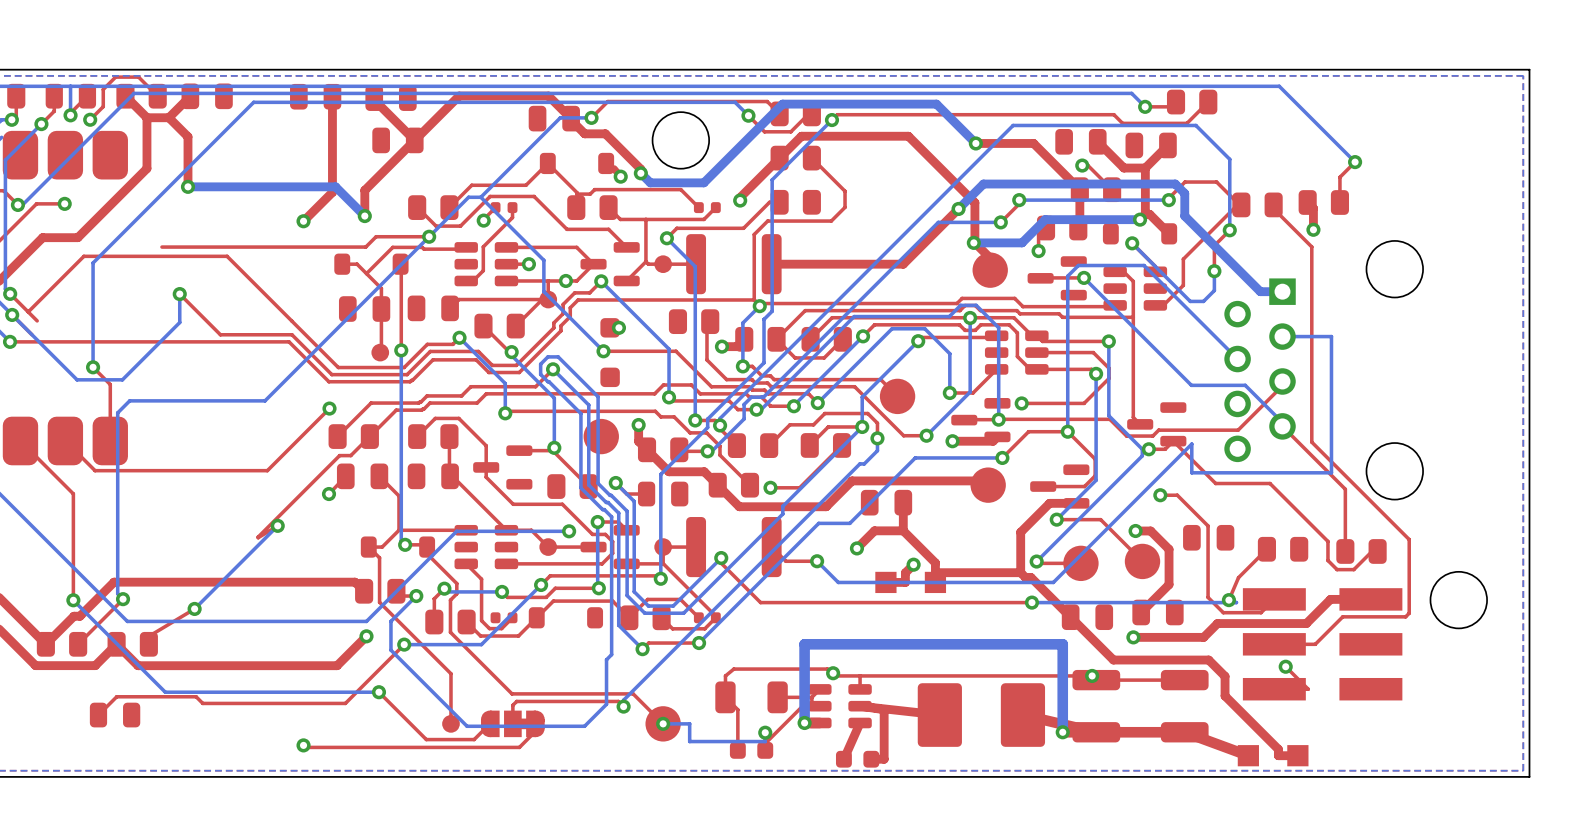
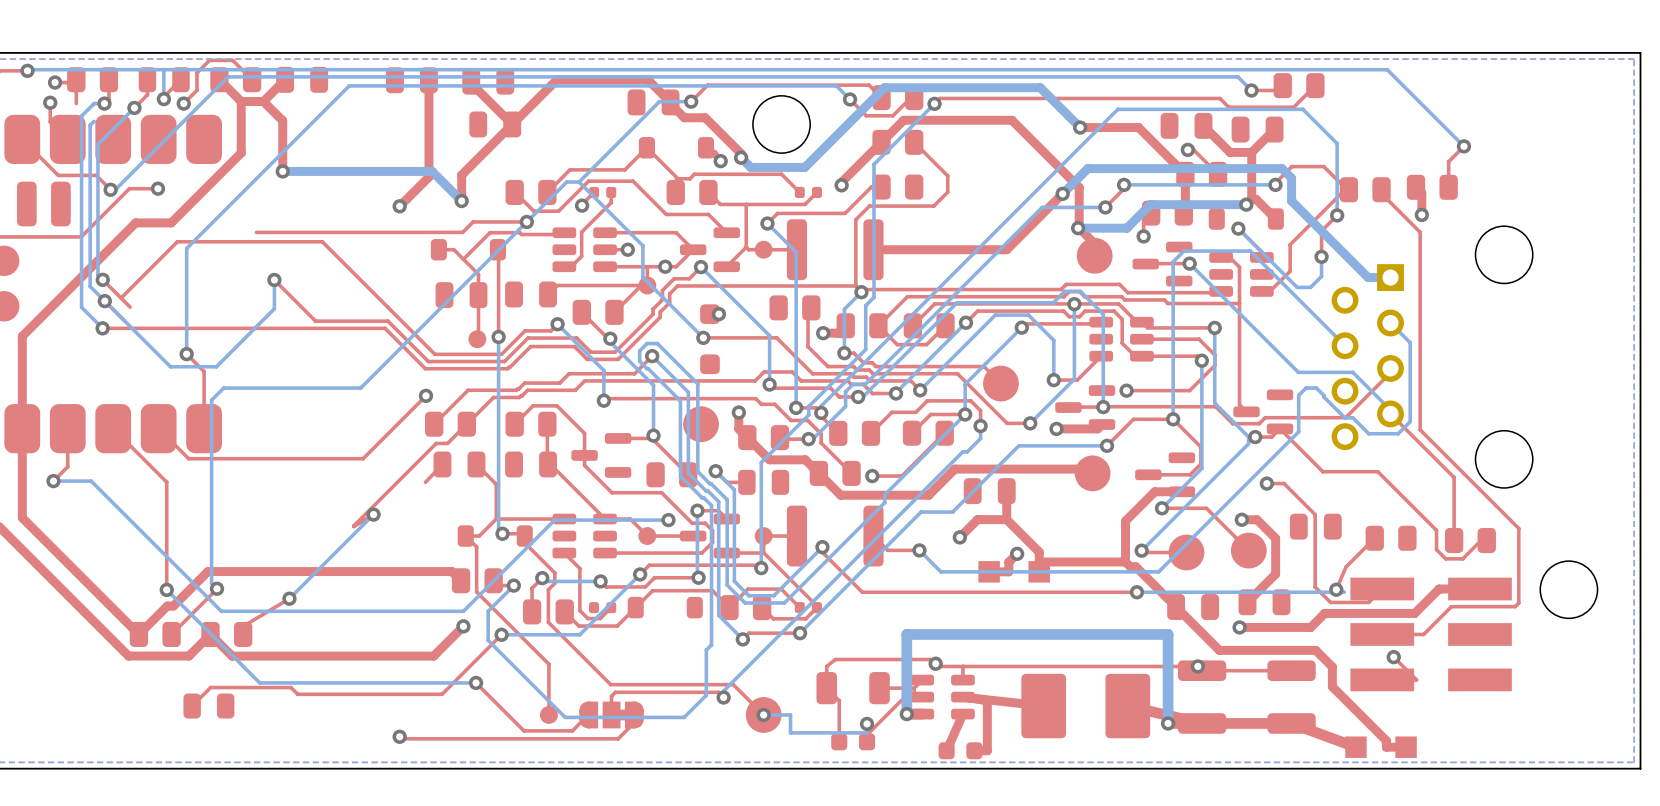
bottom track: (1282, 336) (1331, 336) (1331, 472) (1191, 472) (1191, 444) -> (1390, 323) (1410, 342) (1410, 421) (1398, 433) (1368, 433) (1352, 417) (1344, 417) (1316, 388) (1306, 388) (1298, 395) (1298, 431)
via: (328, 494) -> none

